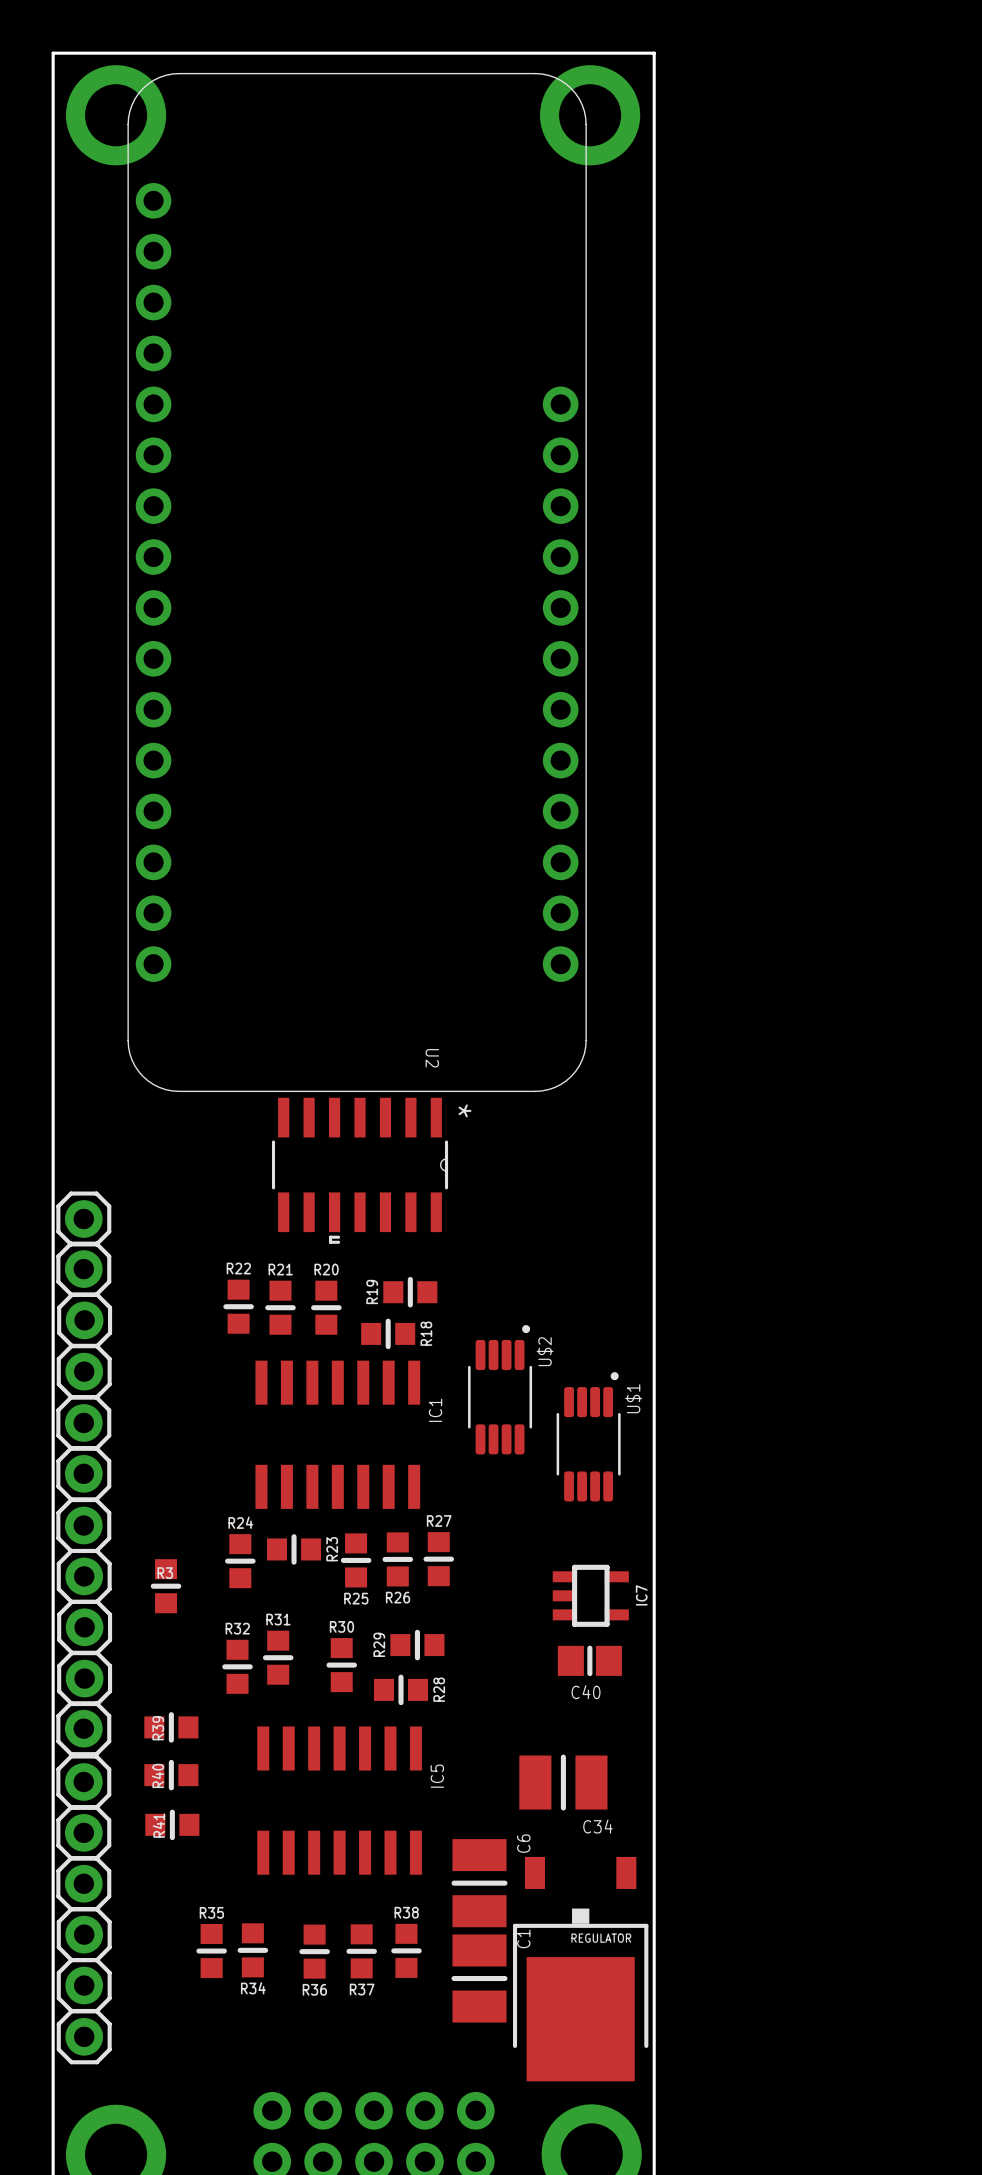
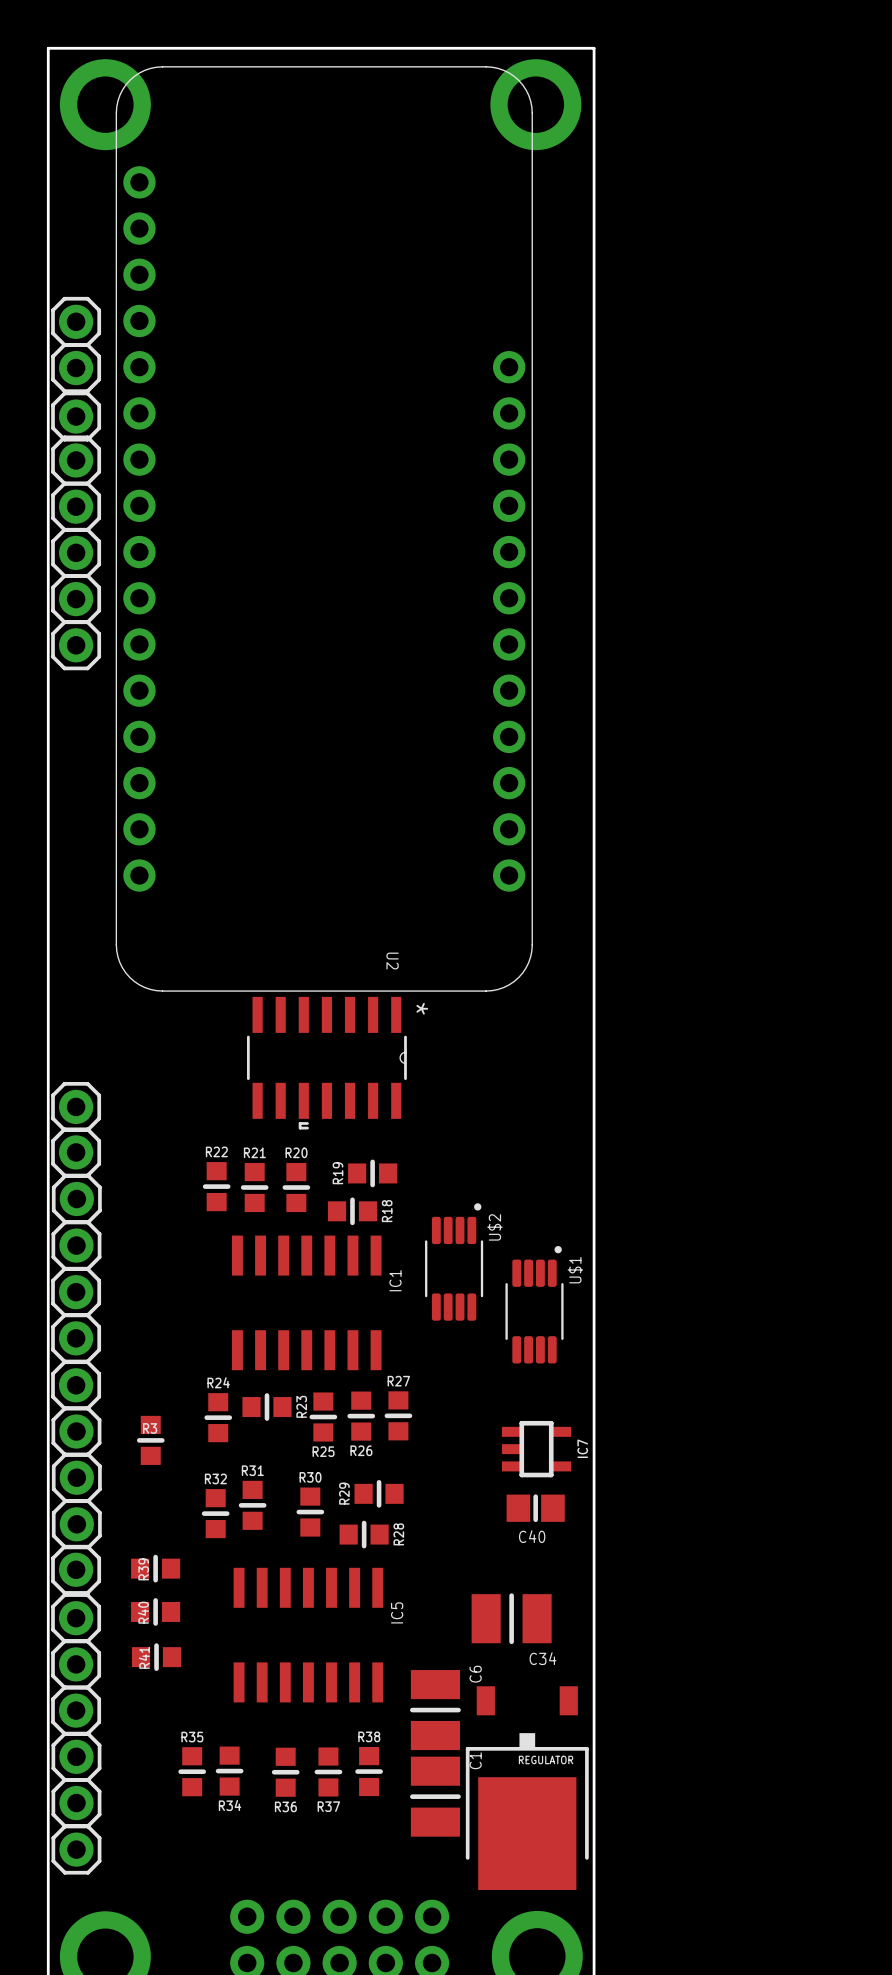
part: none -> (76, 321)
part: none -> (76, 368)
part: none -> (76, 416)
part: none -> (76, 460)
part: none -> (76, 506)
part: none -> (76, 552)
part: none -> (76, 599)
part: none -> (76, 645)

